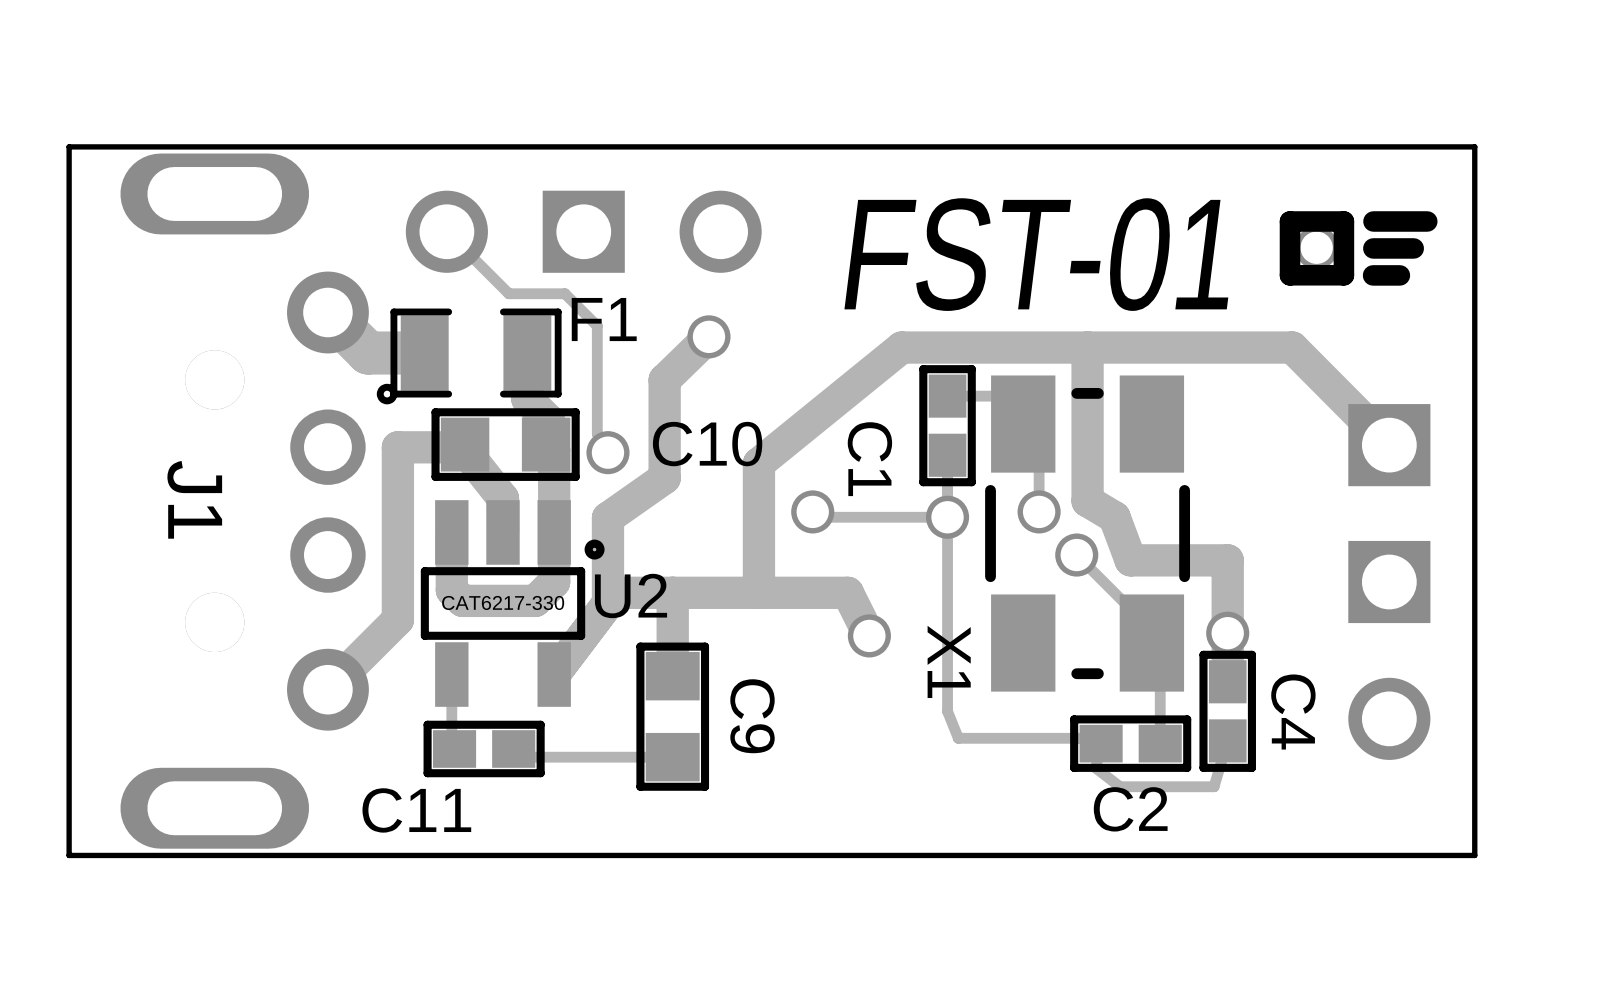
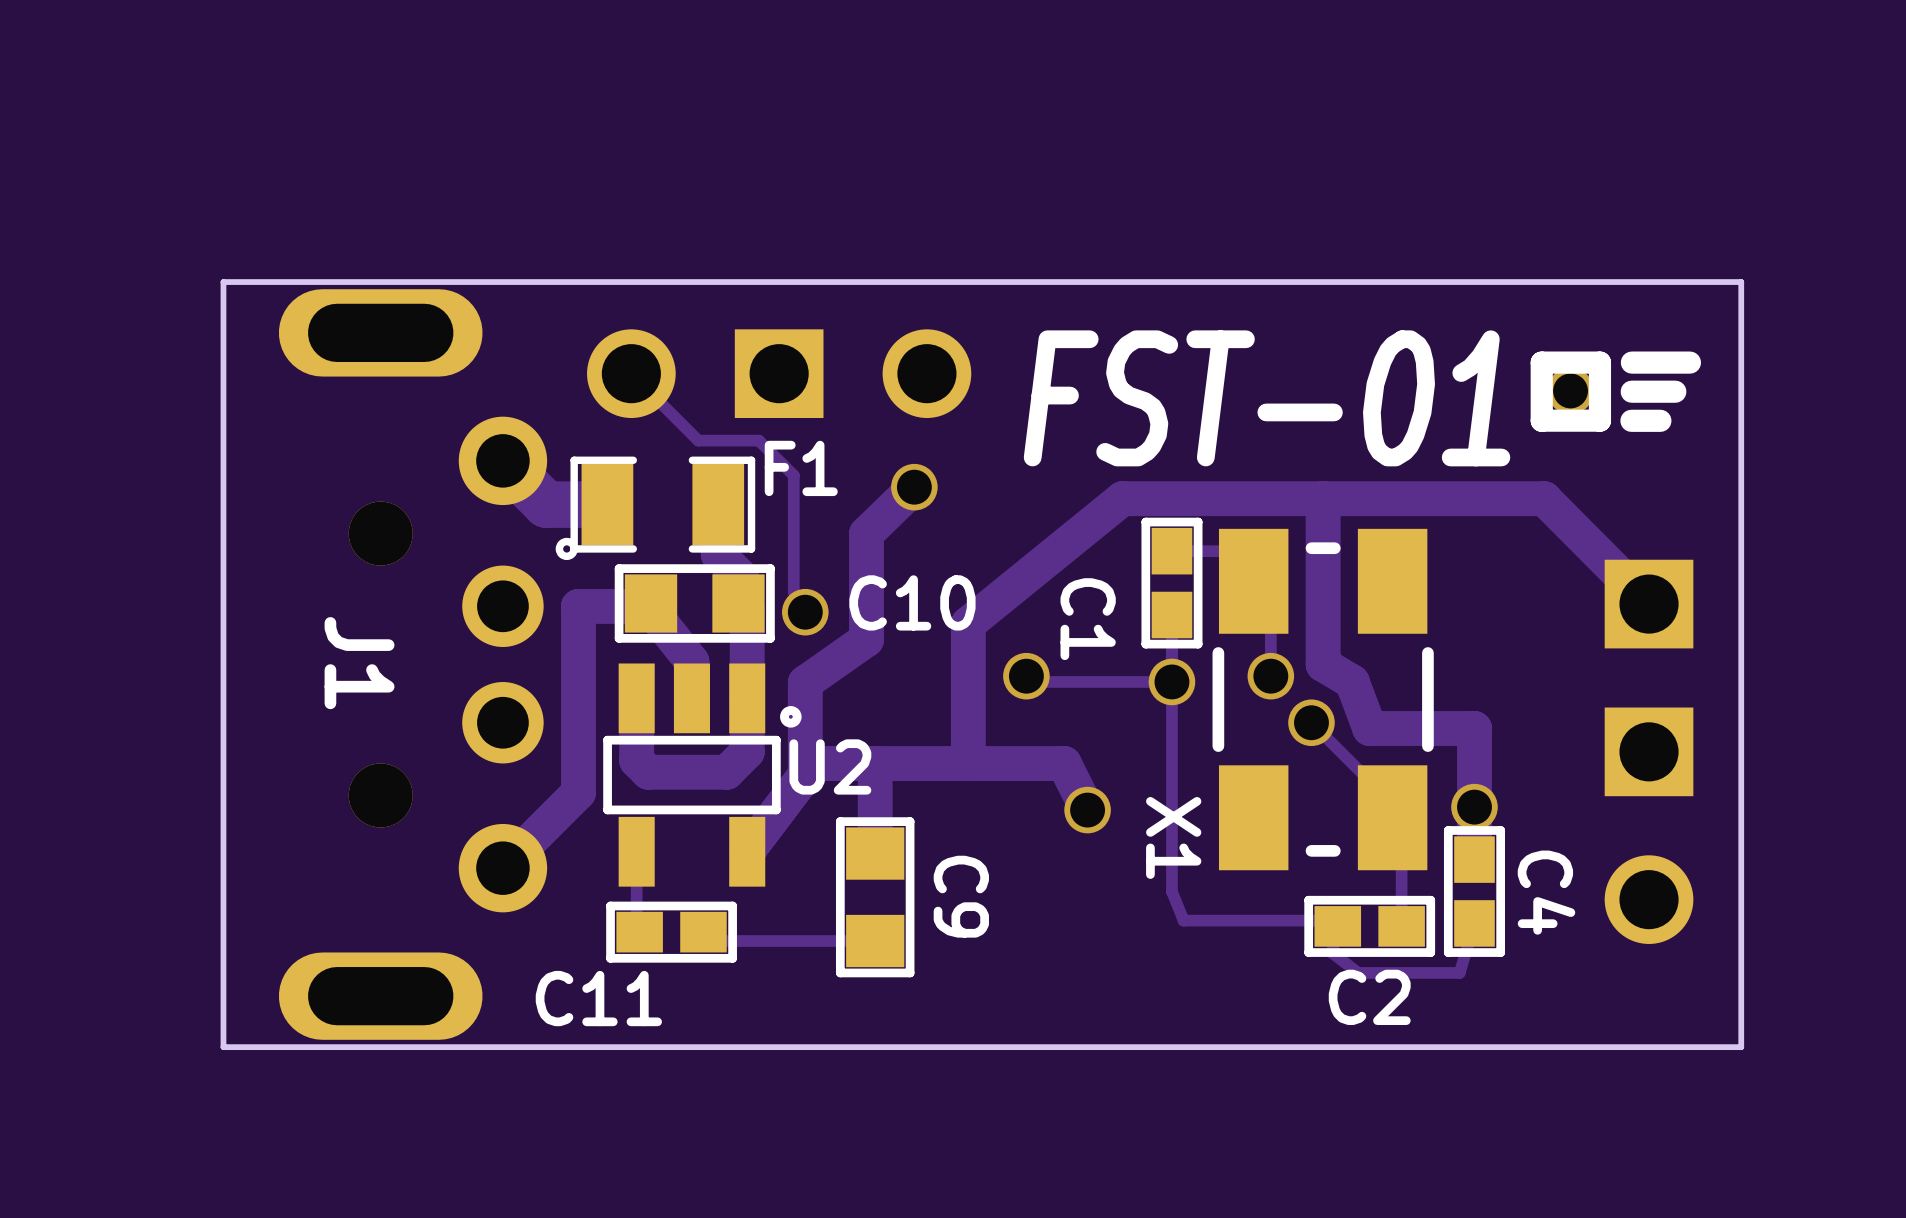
U2 value: CAT6217-330 (503, 602) -> none

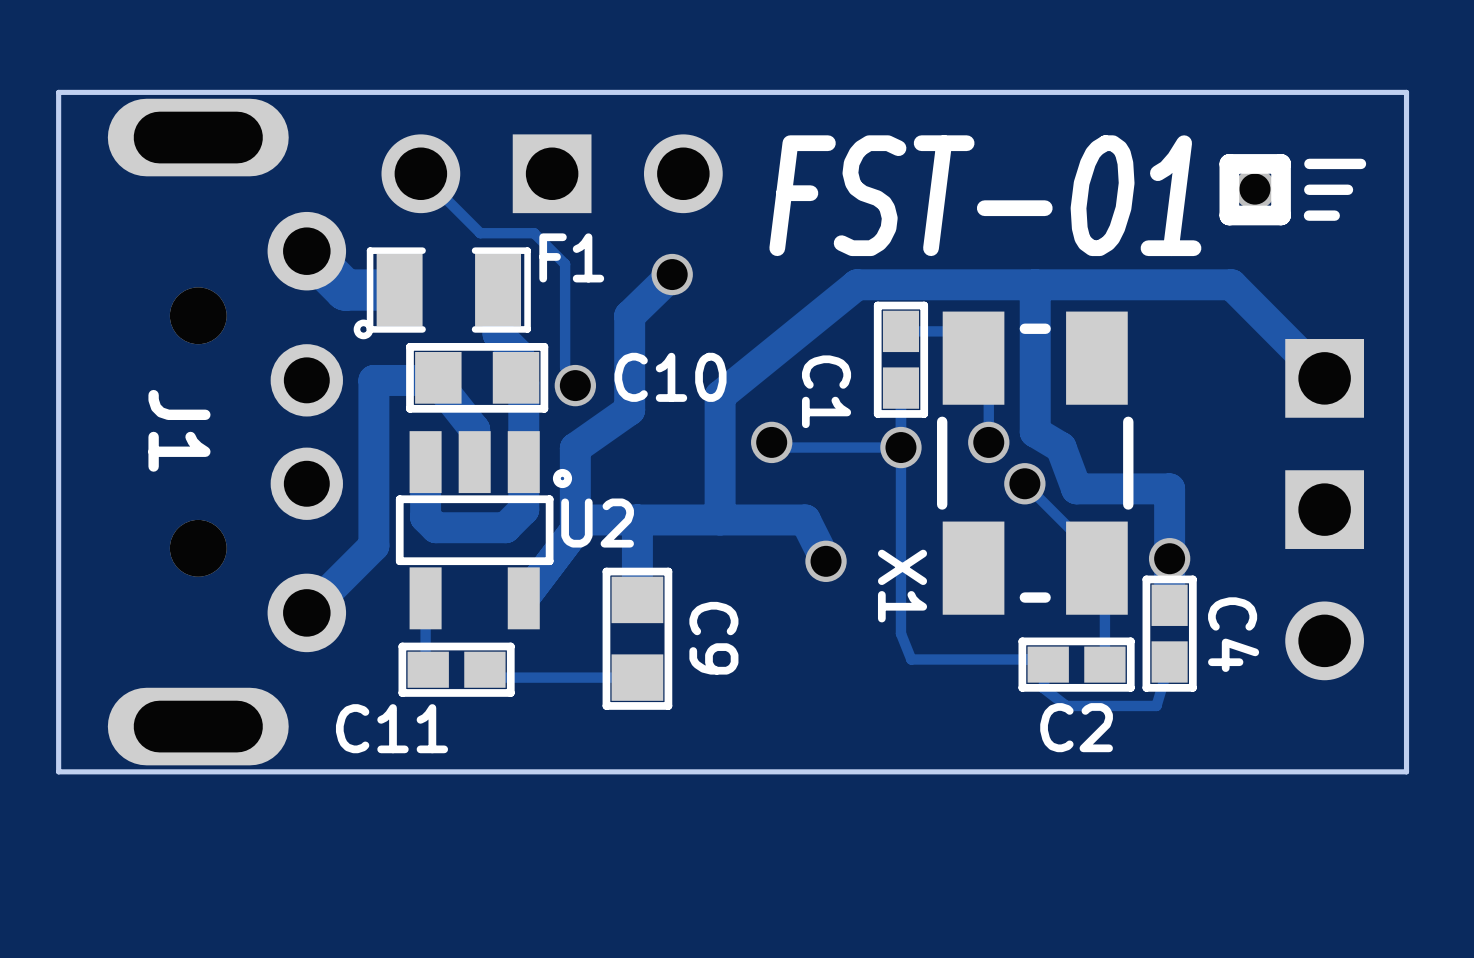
line width: thick (1689, 362) (1631, 362) -> thin (1360, 163) (1309, 163)
line width: thick (1675, 391) (1631, 391) -> thin (1347, 189) (1309, 189)
line width: thick (1660, 420) (1631, 420) -> thin (1334, 215) (1309, 215)

